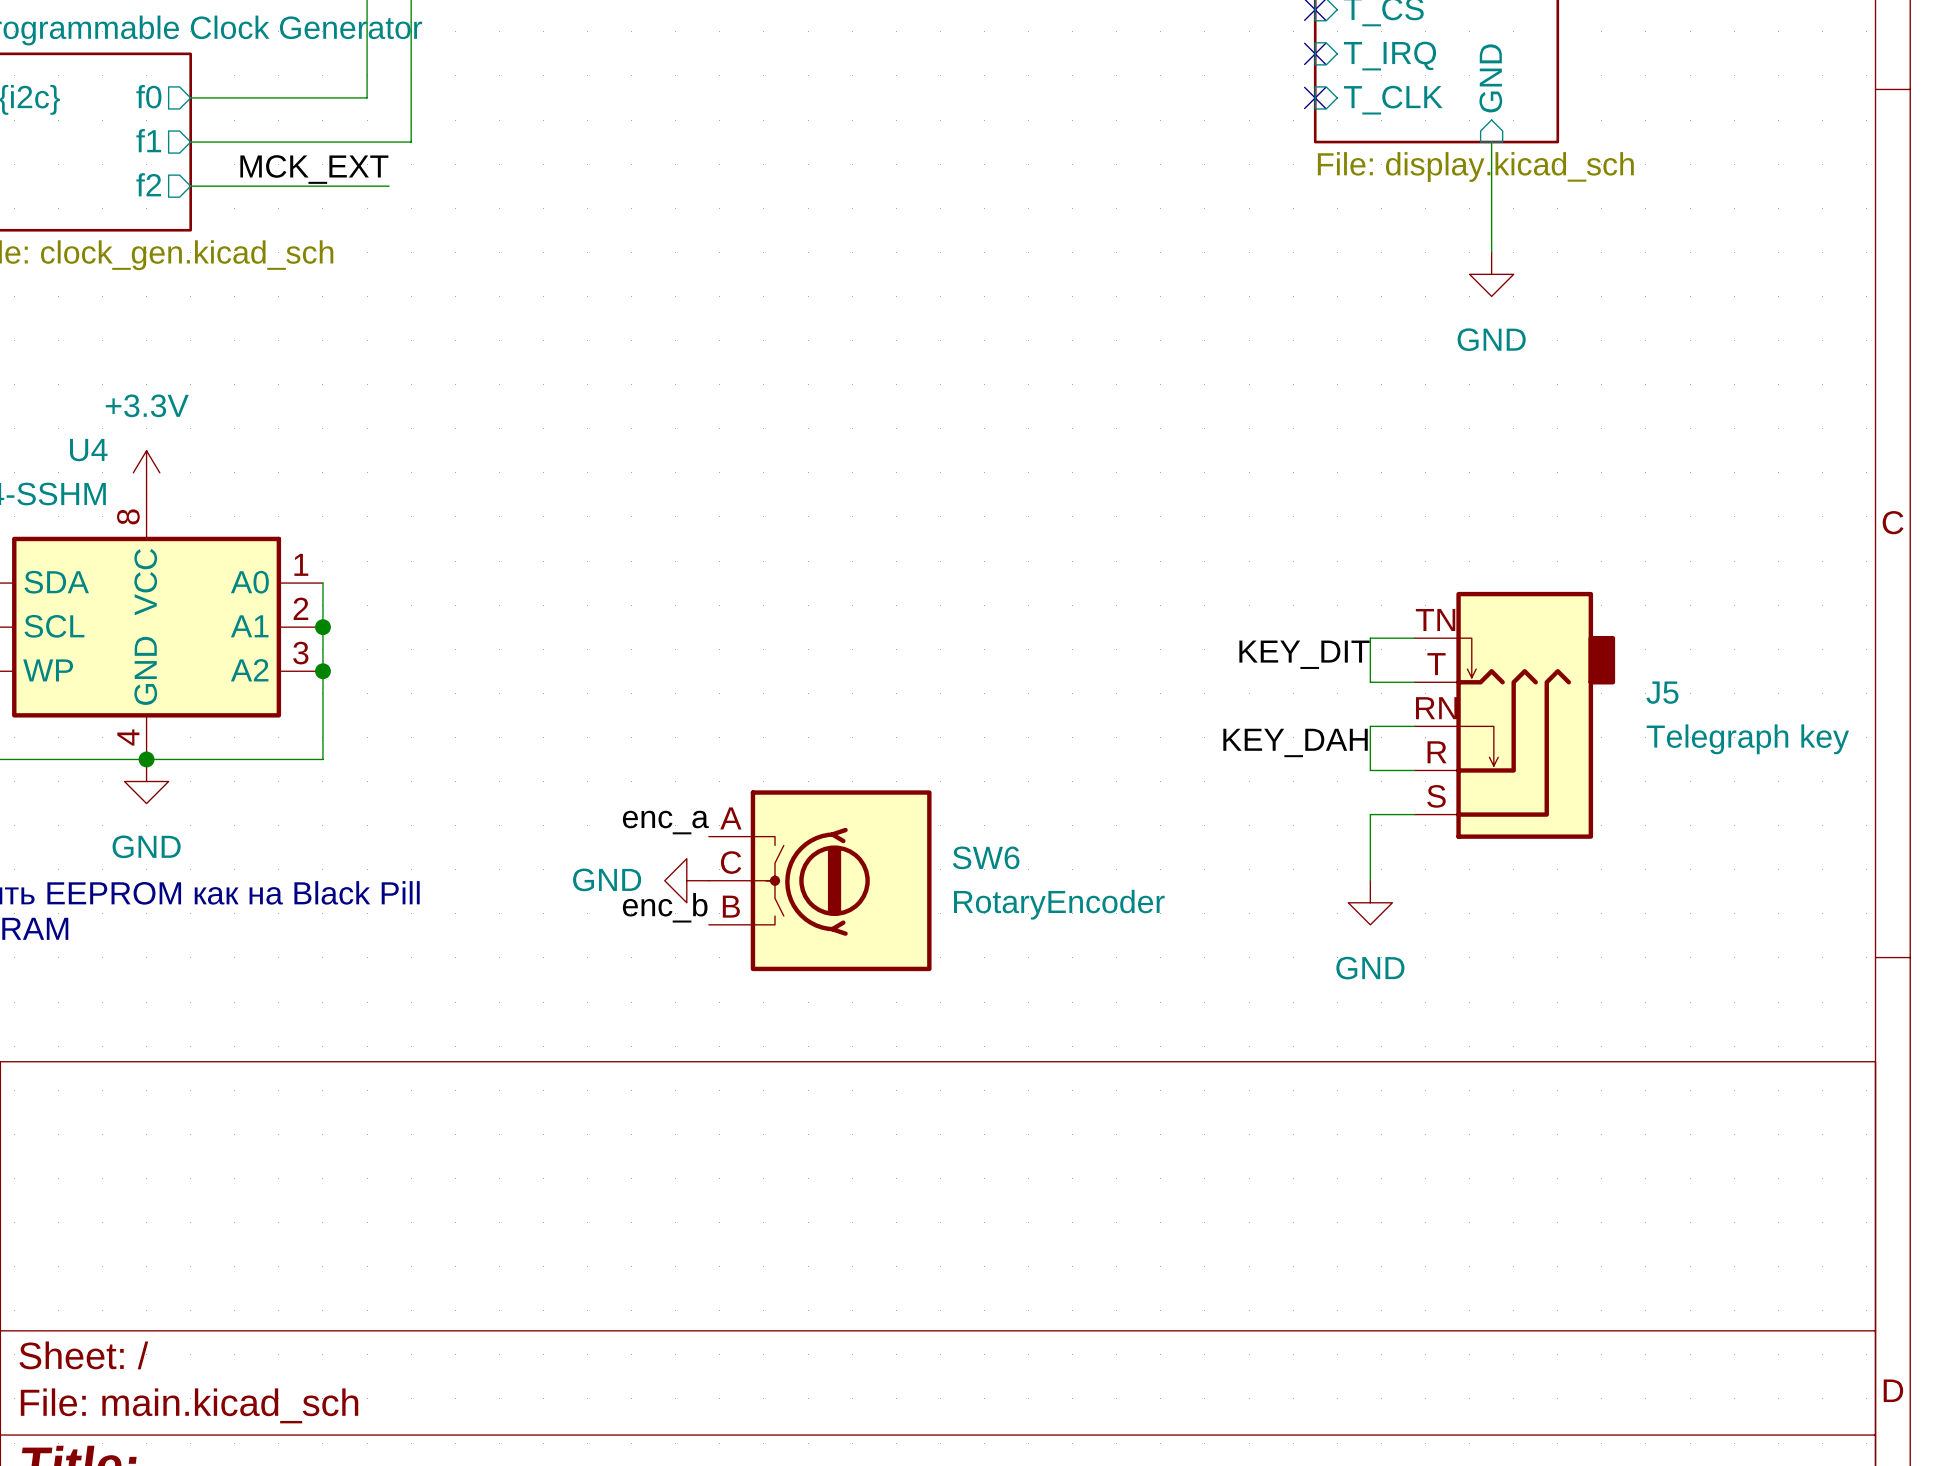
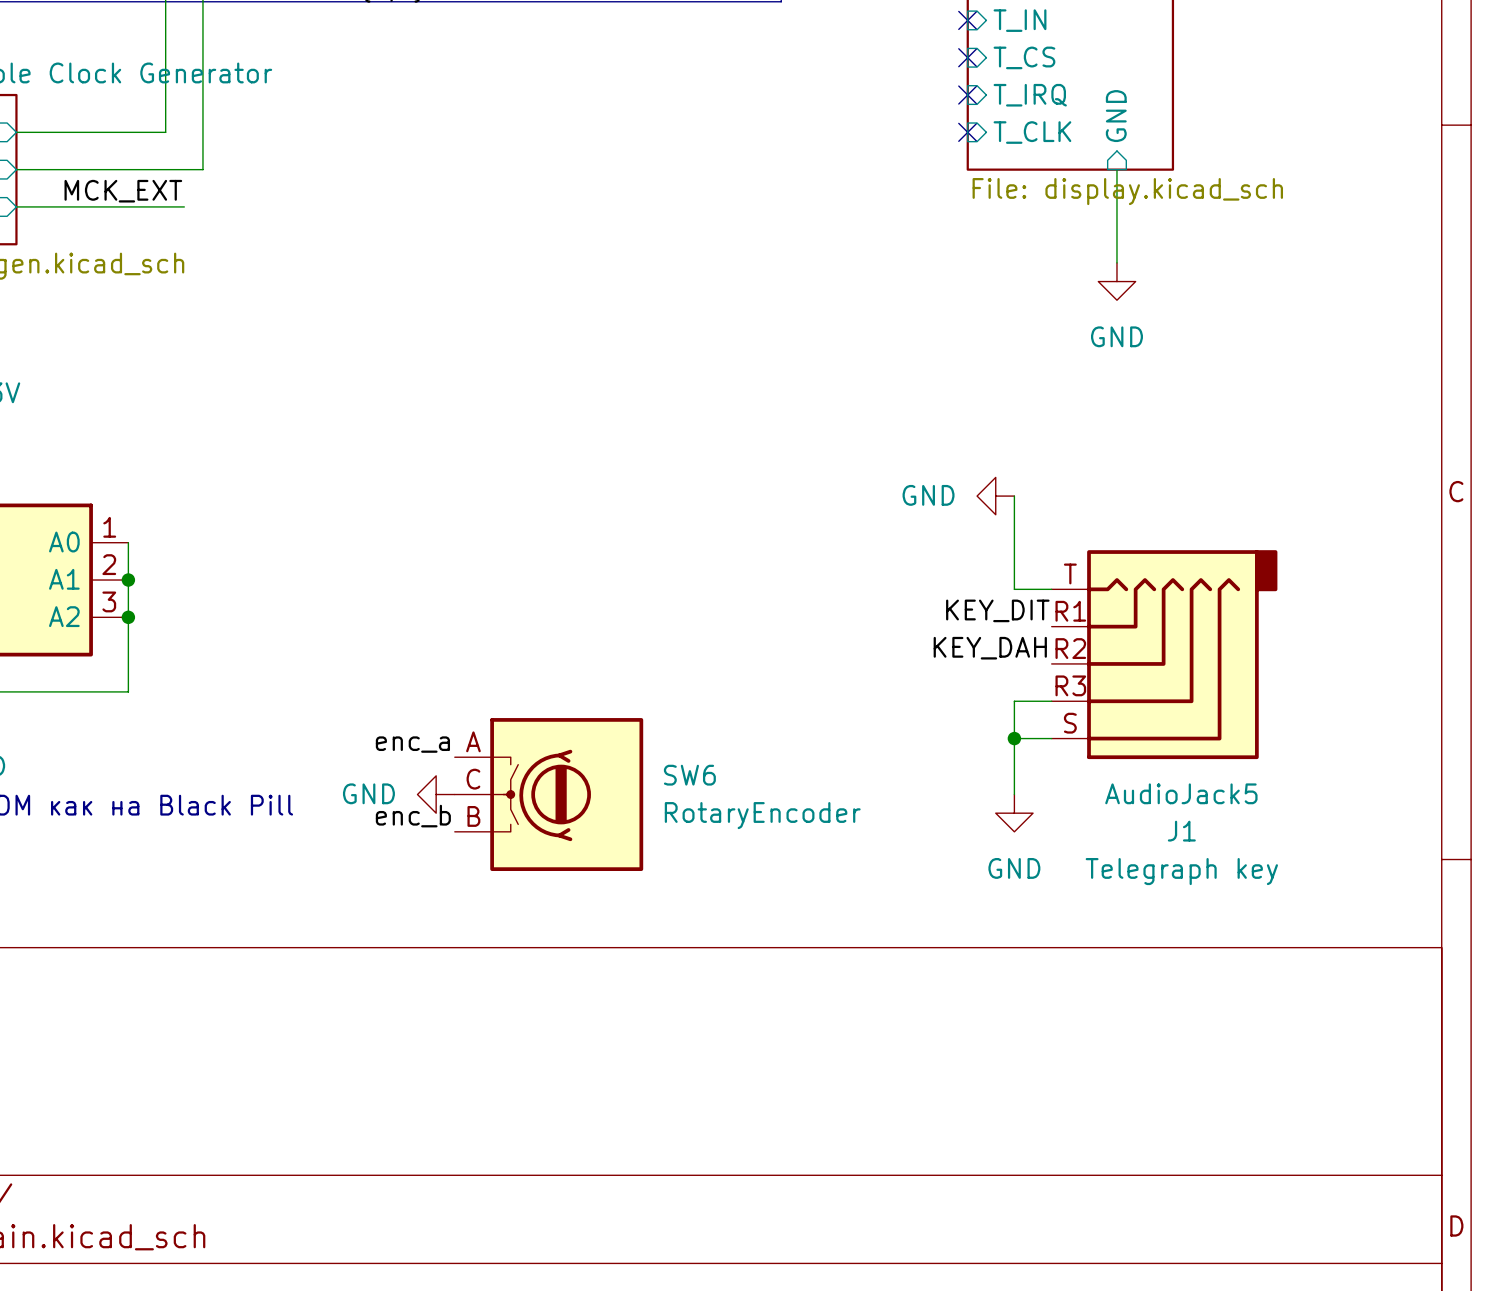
power symbol: none -> GND (995, 496)
wire: (1370, 638) (1370, 682) (1414, 682) -> (1014, 589) (1014, 496)
label position: KEY_DIT (1304, 654) -> KEY_DIT (997, 610)
J5: Telegraph key (1514, 715) -> none
J1: none -> AudioJack5 (1164, 654)
wire: (1414, 726) (1370, 726) (1370, 770) -> (1014, 738) (1014, 701)
label position: KEY_DAH (1295, 742) -> KEY_DAH (990, 648)
junction: none -> (1014, 738)

